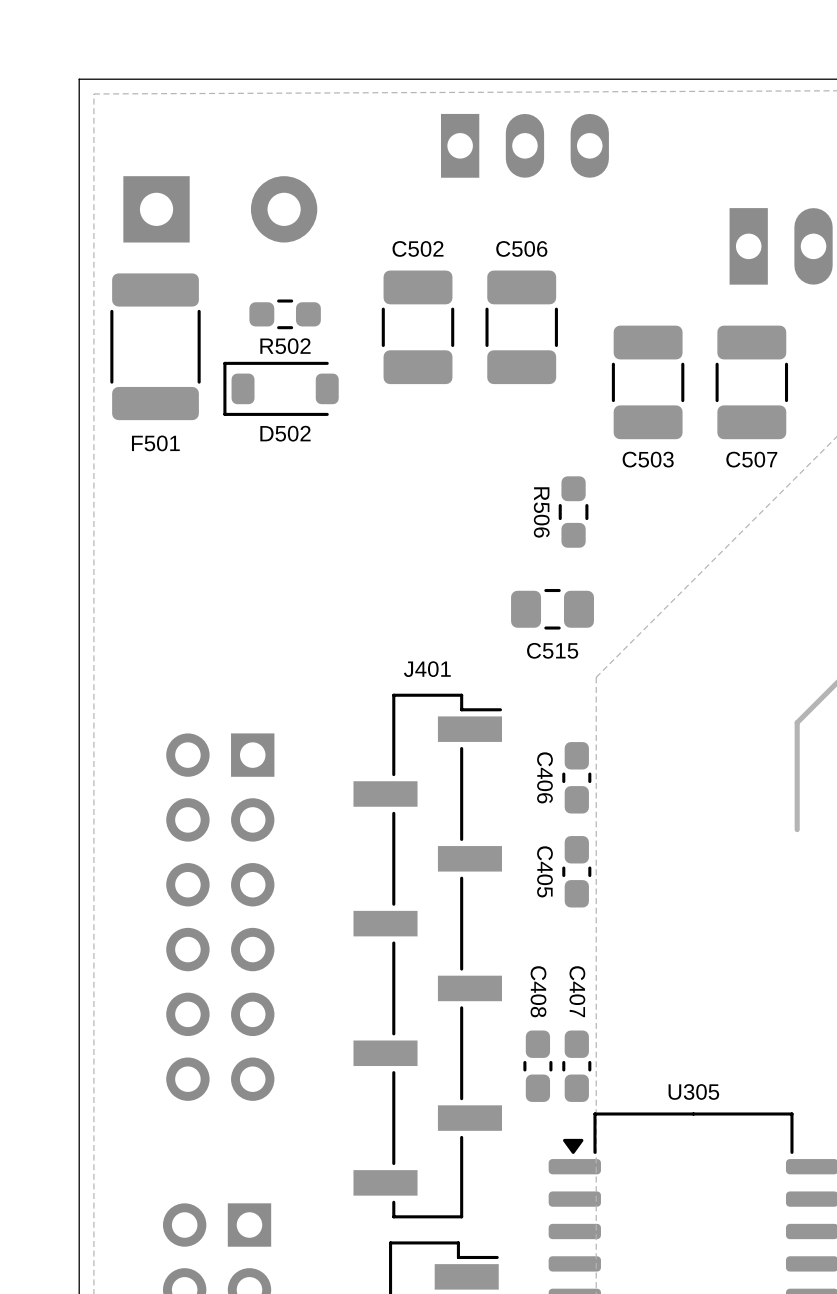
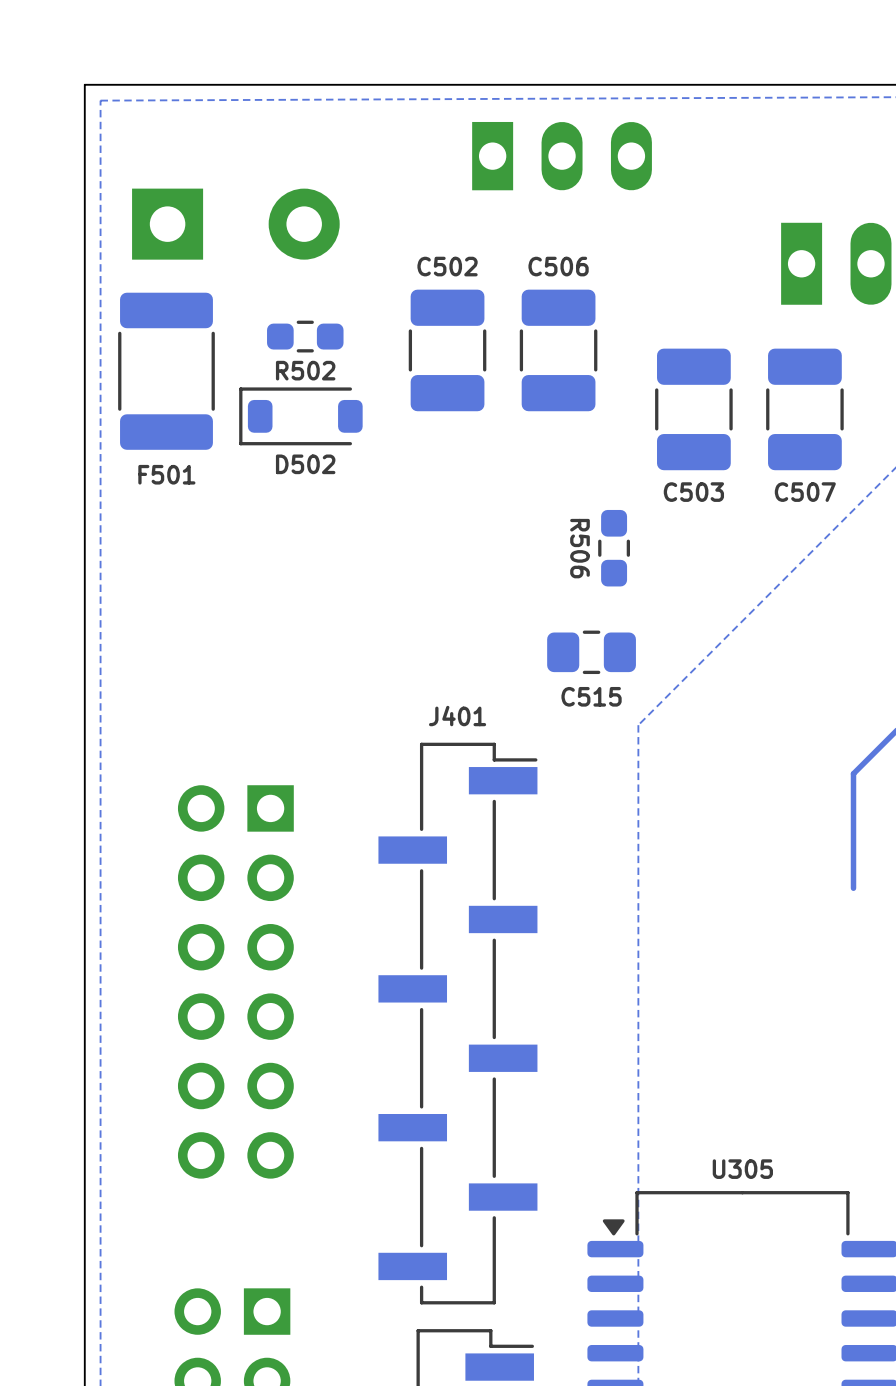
C406: (576, 777) -> none
C405: (576, 871) -> none
C408: (537, 1066) -> none
C407: (576, 1066) -> none

